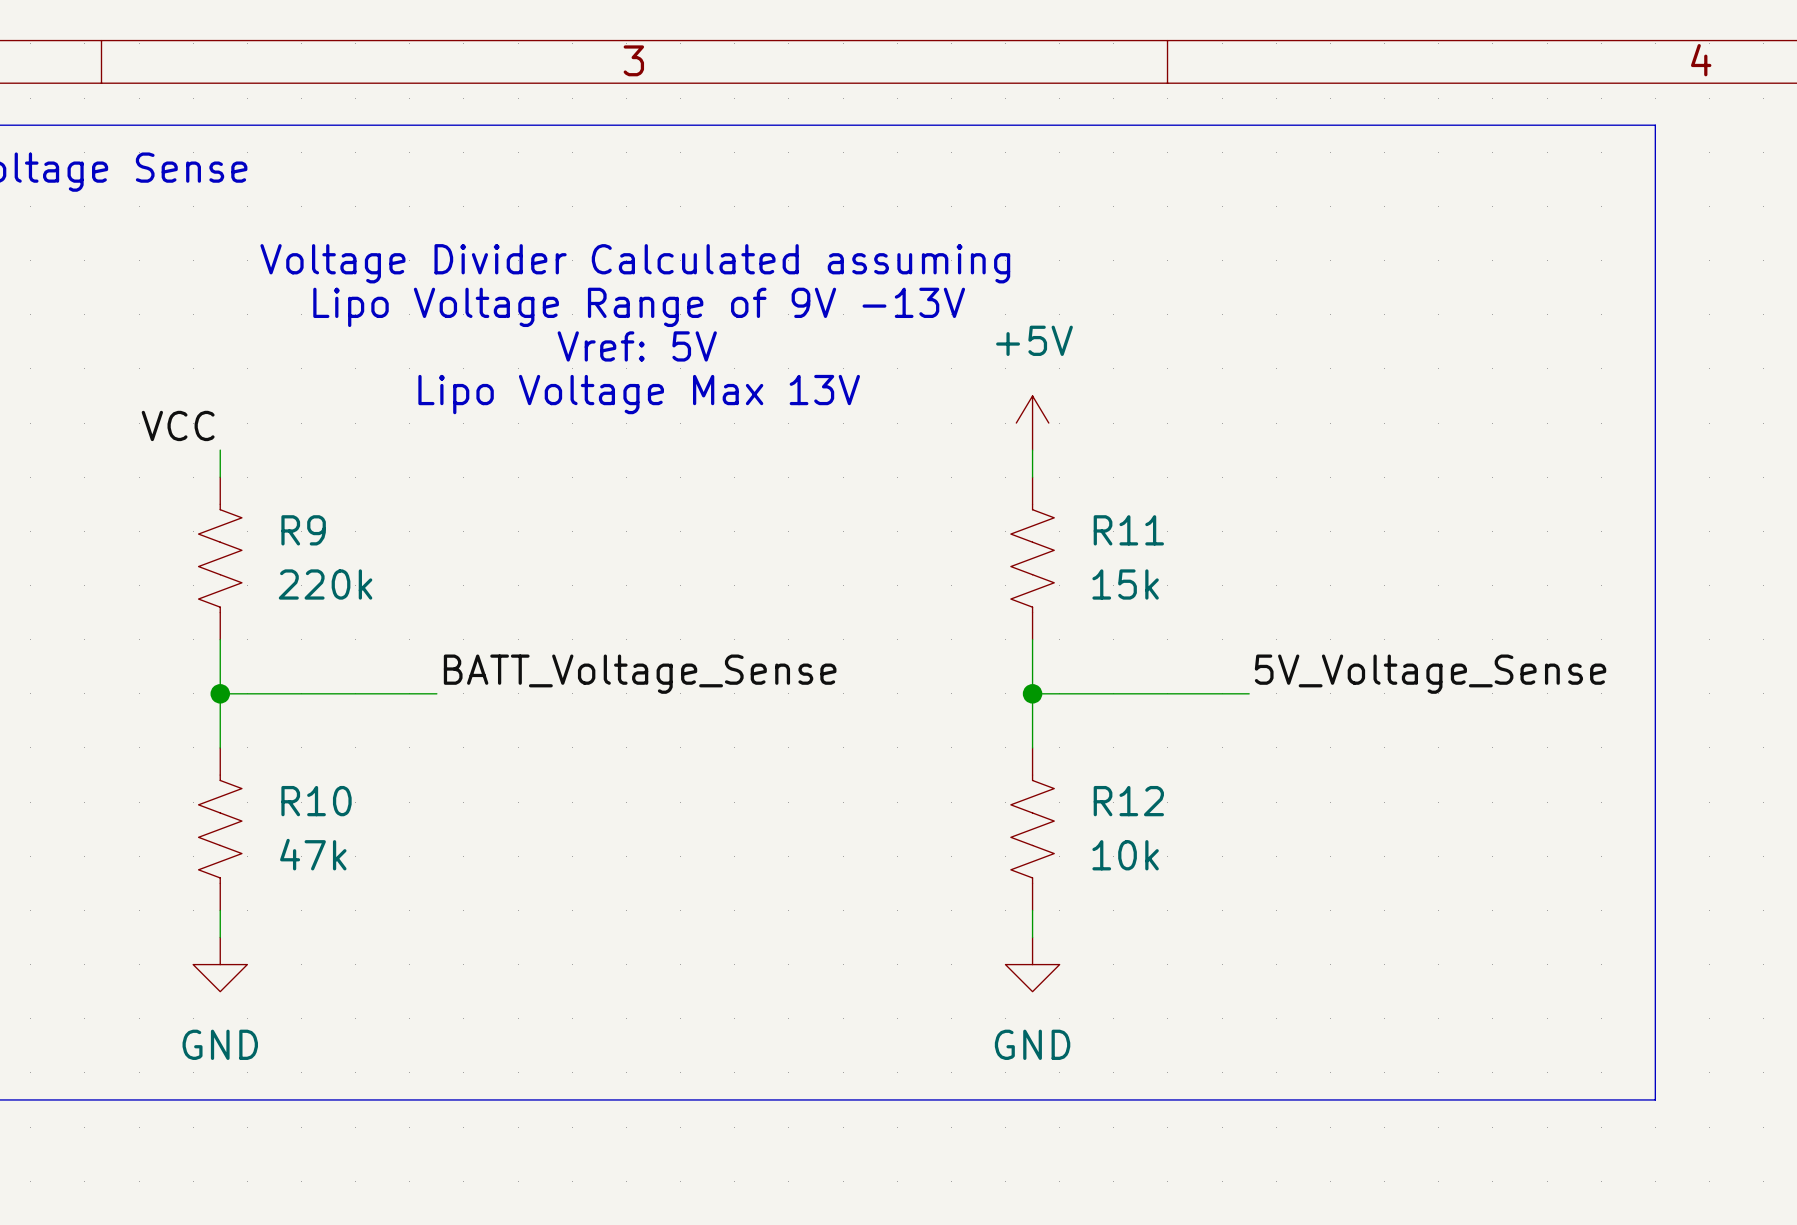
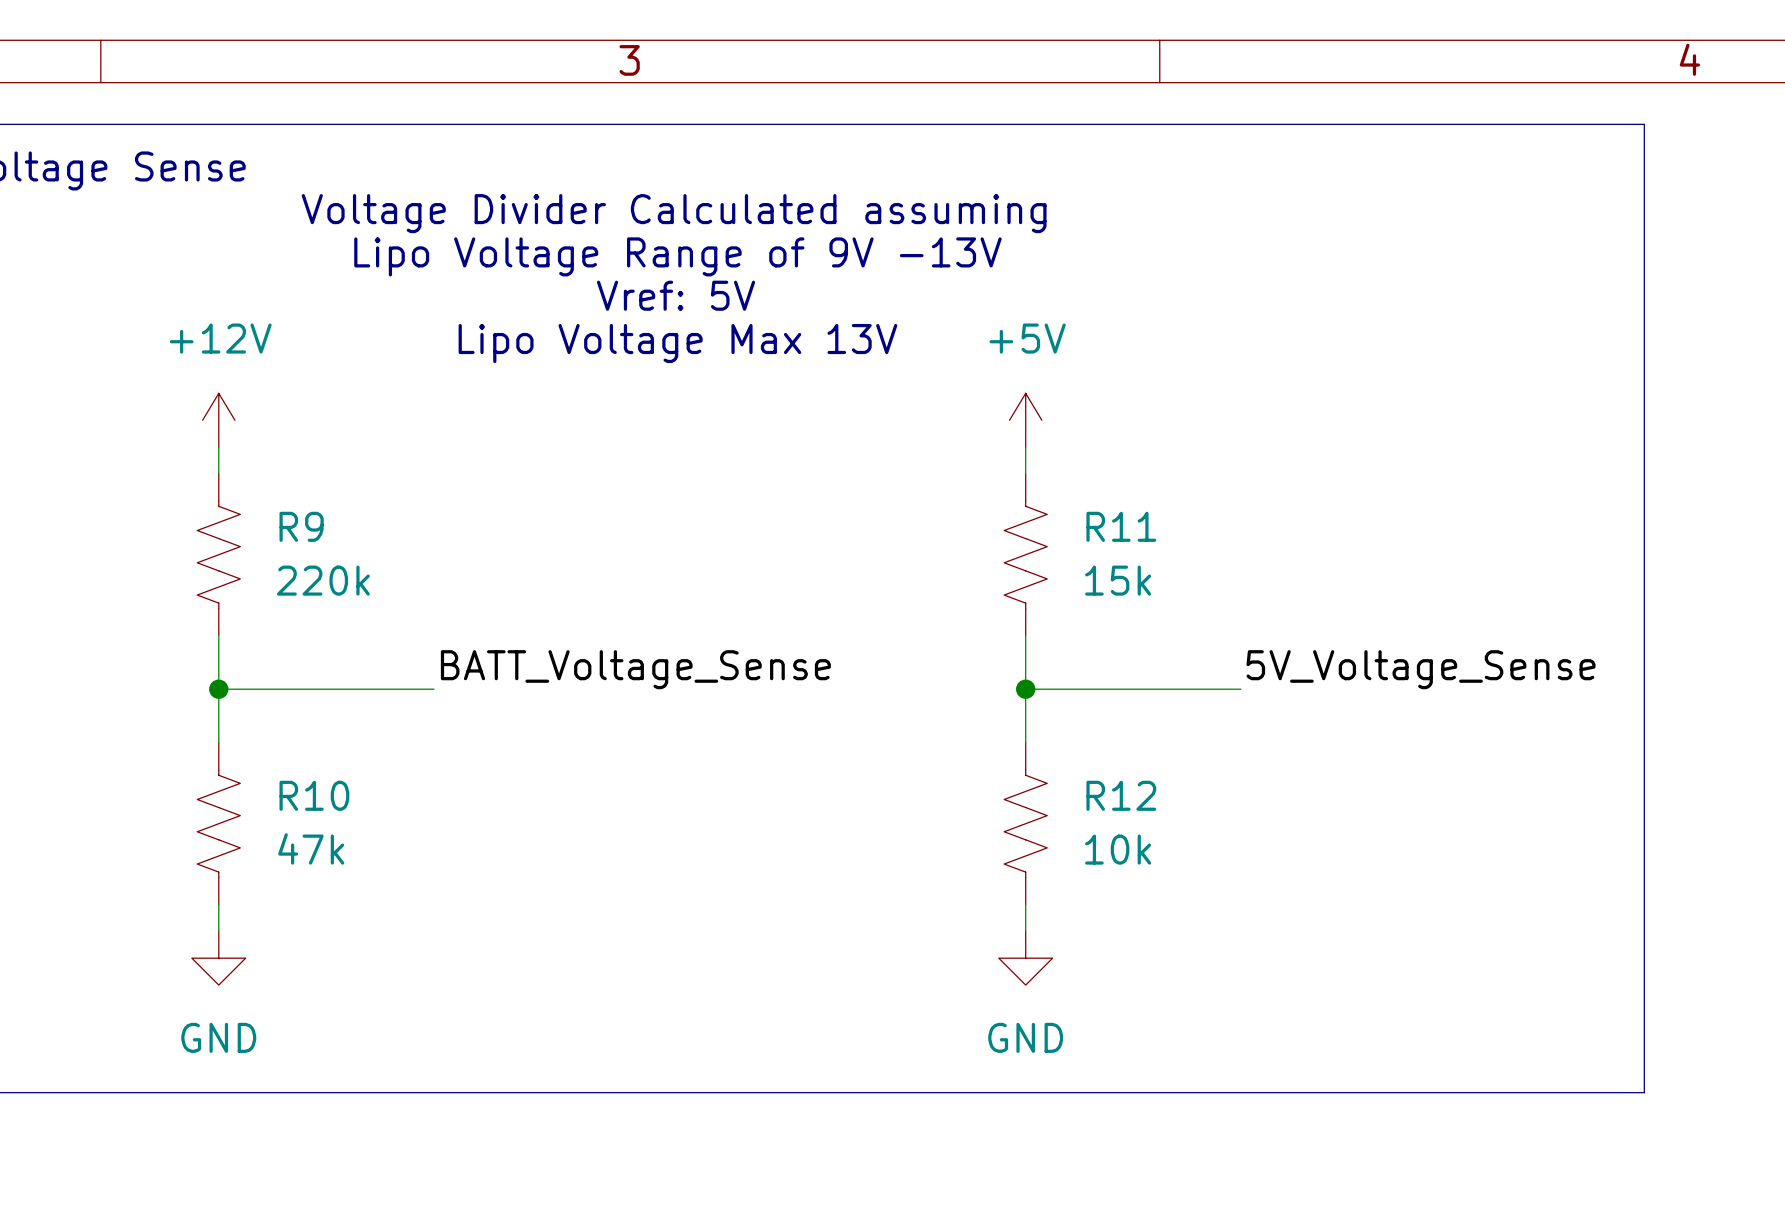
text position: Voltage Divider Calculated assuming (635, 263) -> Voltage Divider Calculated assuming (674, 213)
text position: Lipo Voltage Range of 9V -13V (639, 307) -> Lipo Voltage Range of 9V -13V (677, 256)
text position: Vref: 5V (637, 346) -> Vref: 5V (676, 295)
text position: Lipo Voltage Max 13V (639, 394) -> Lipo Voltage Max 13V (677, 343)
power symbol: none -> +12V (218, 420)
label: VCC (178, 425) -> none

